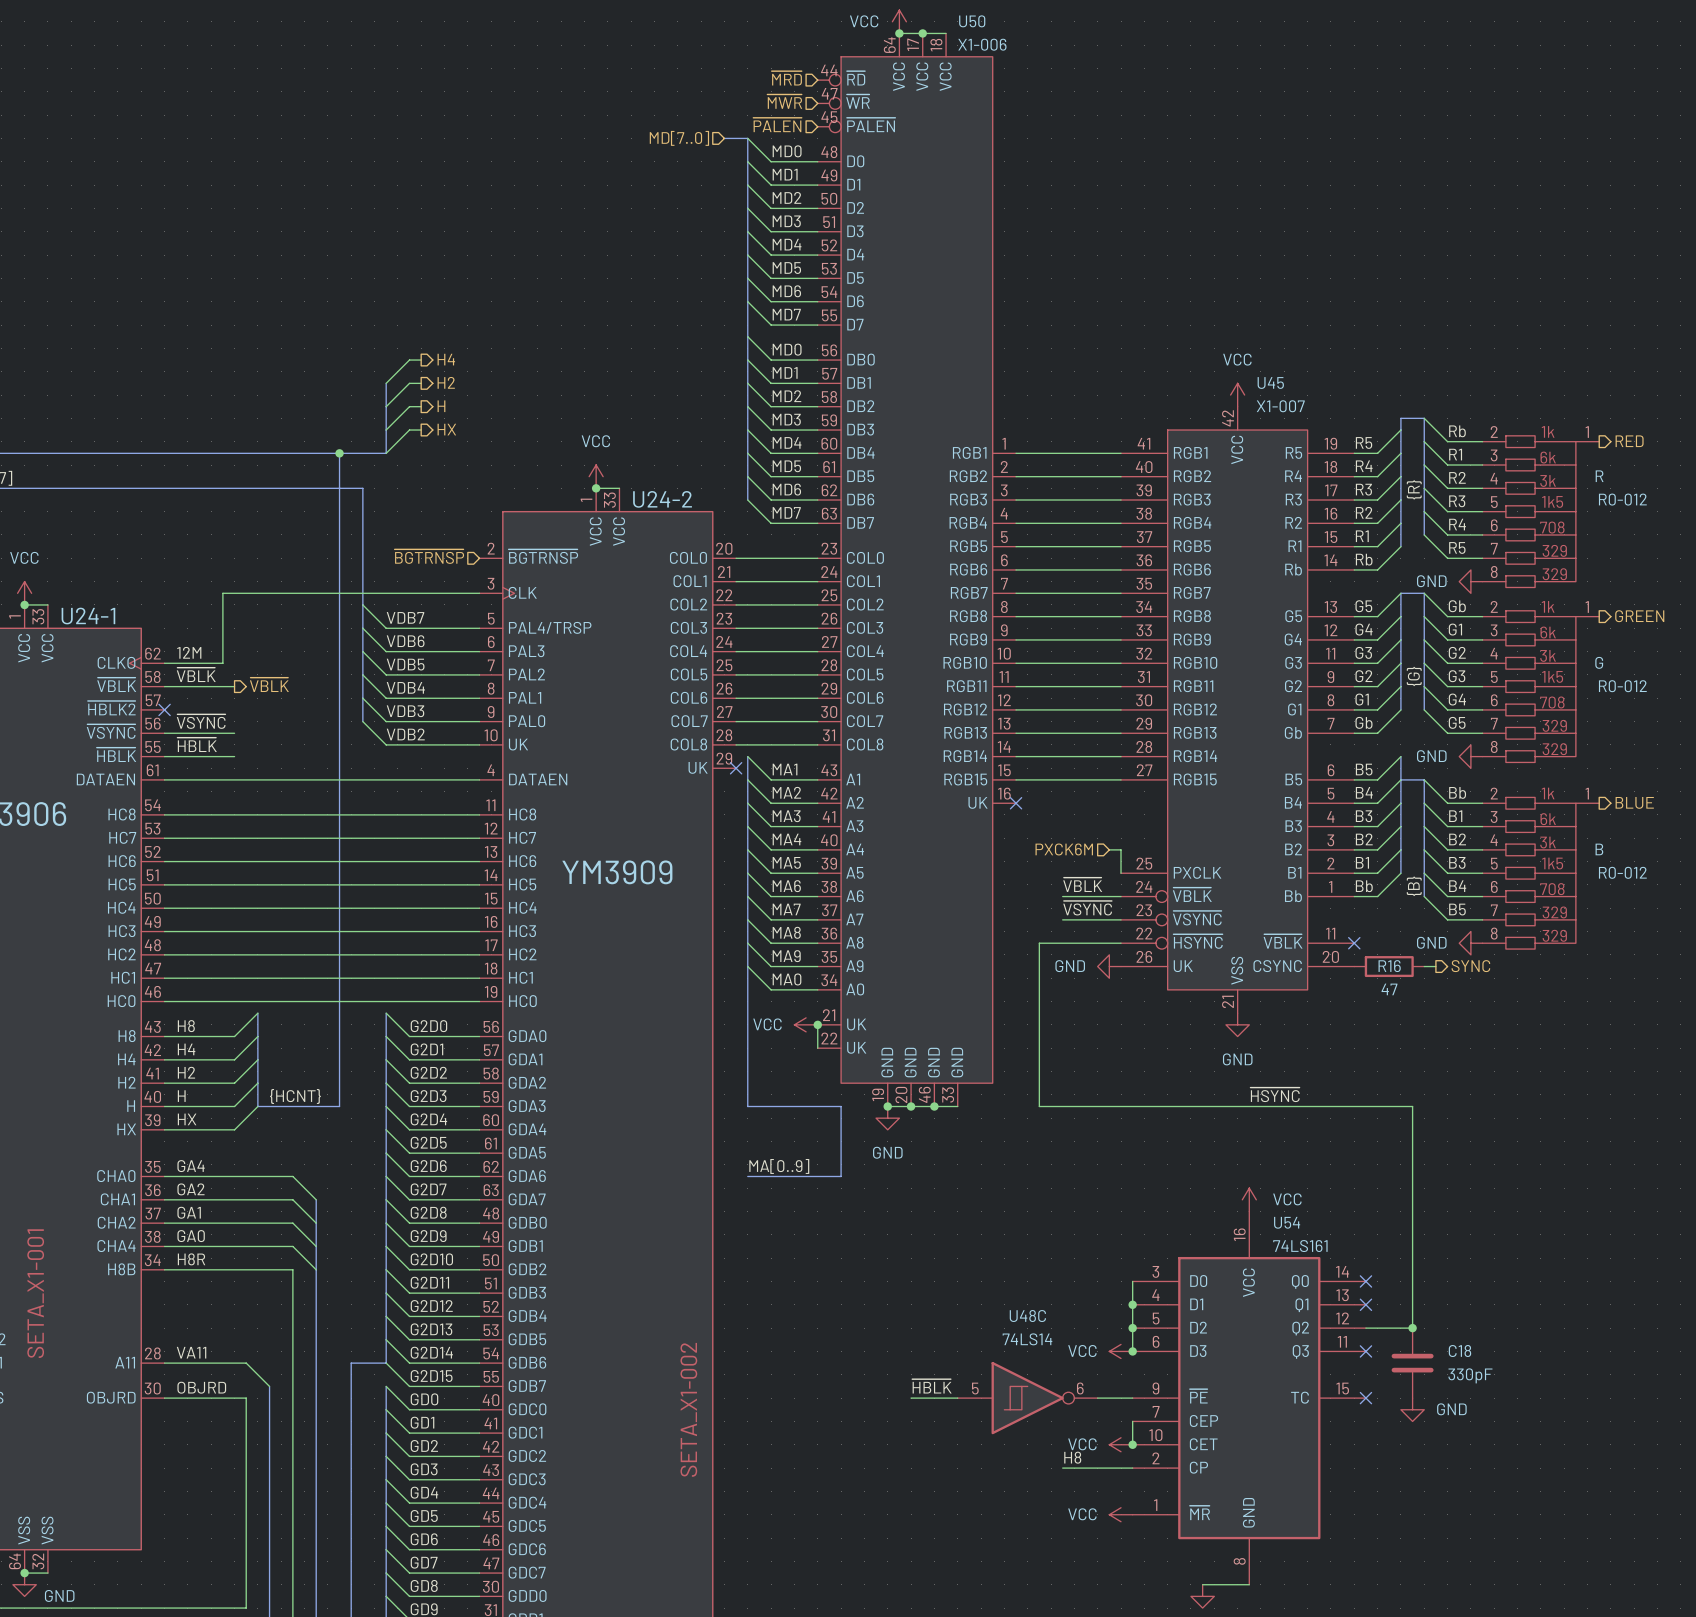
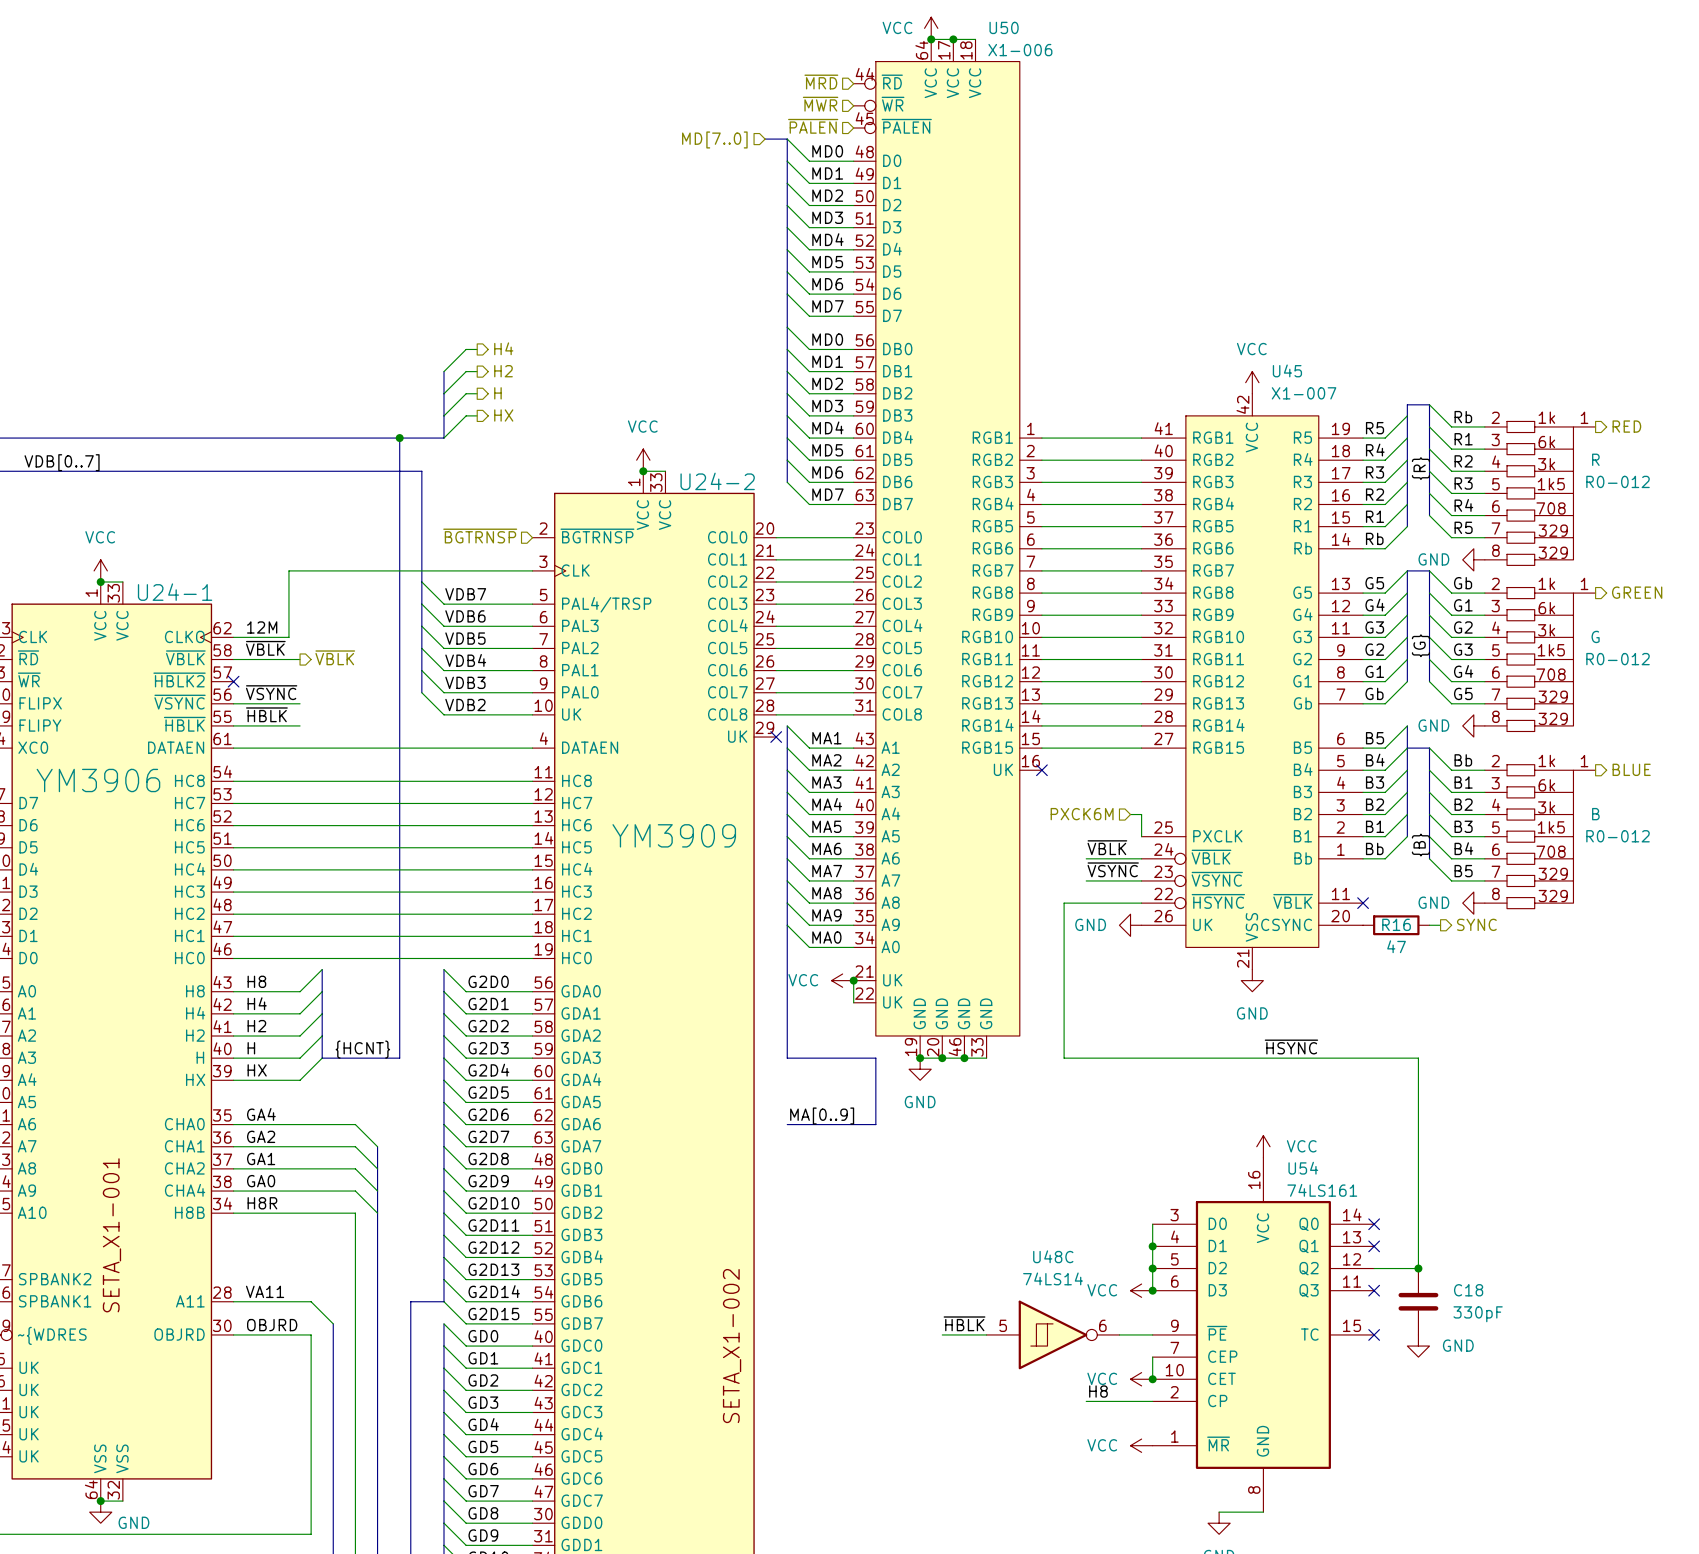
U50 pin number: 47 (829, 93) -> none

